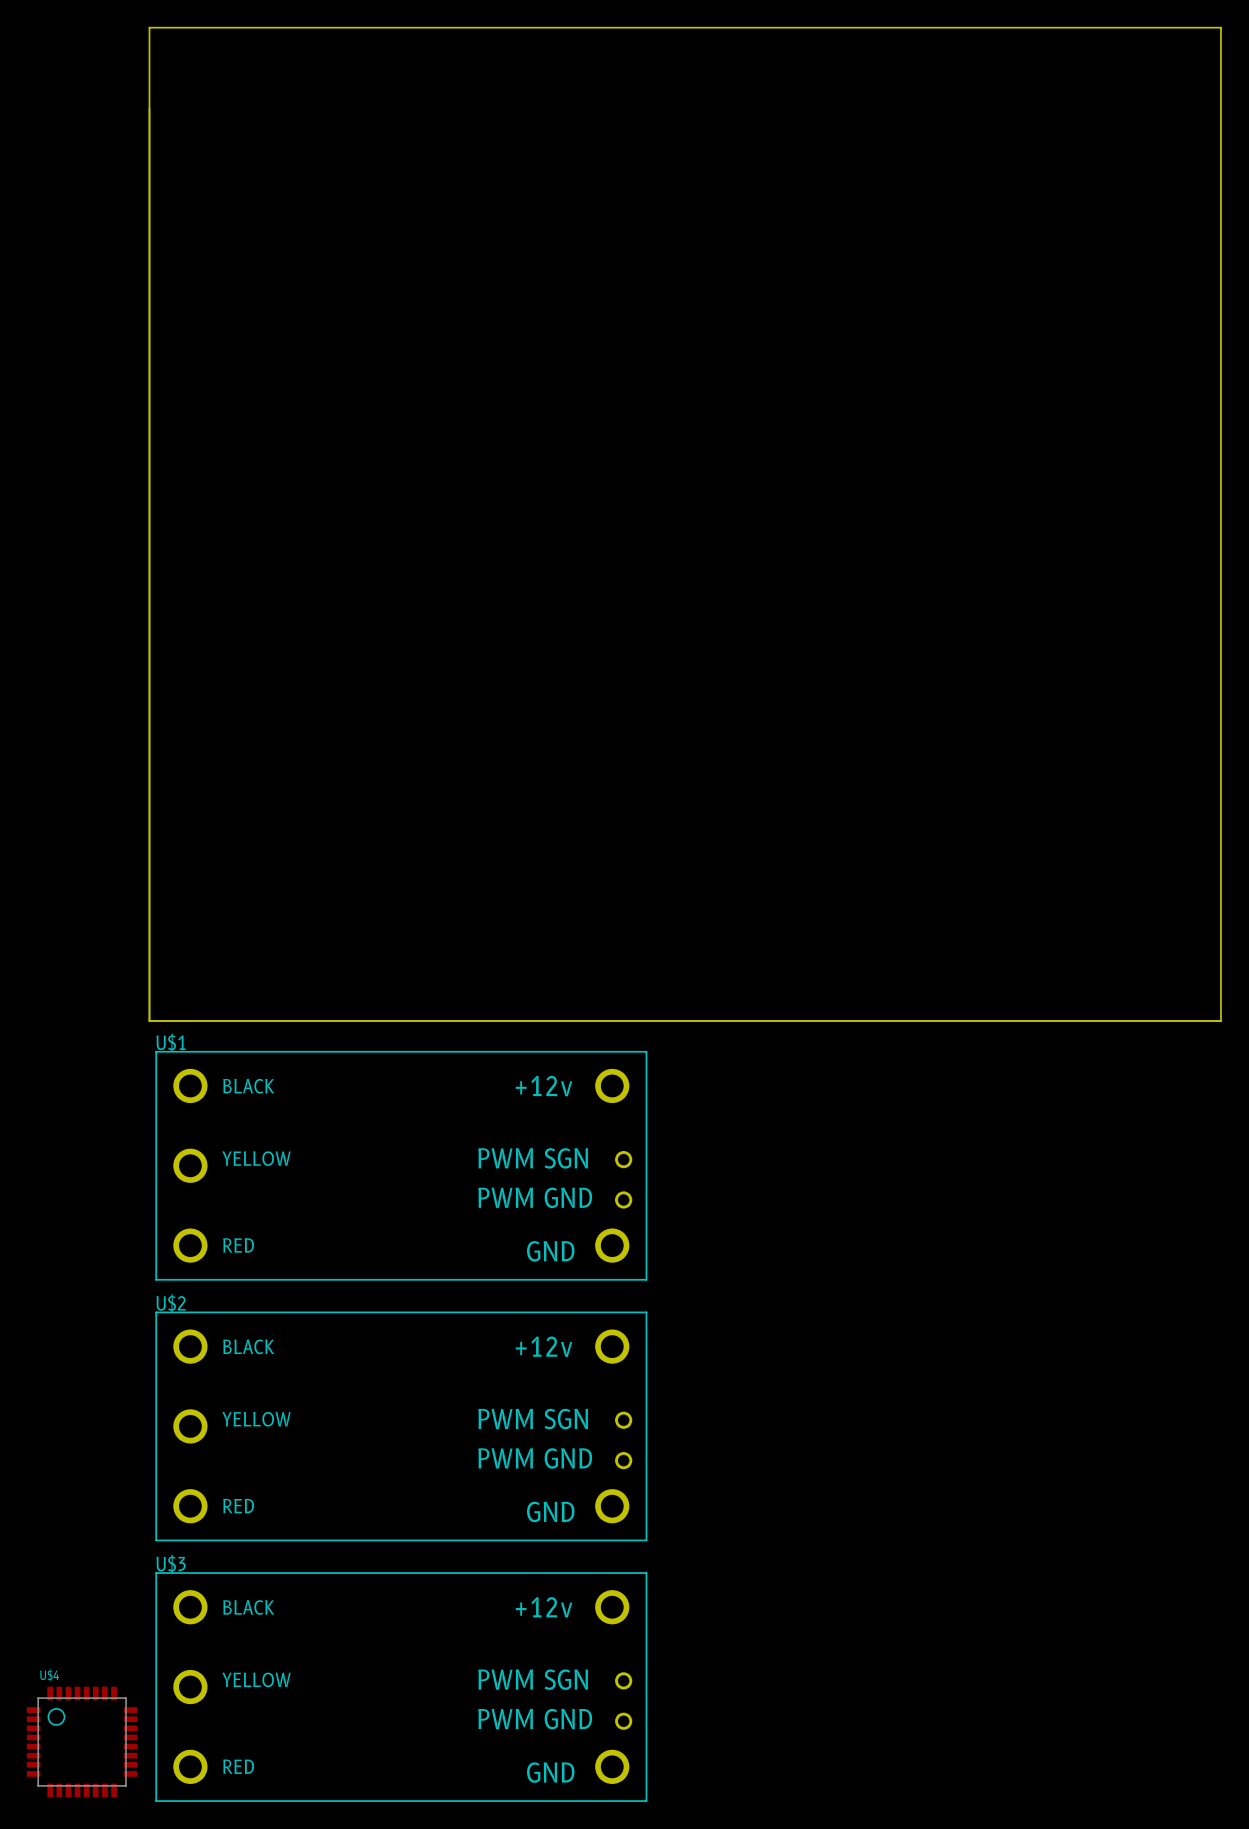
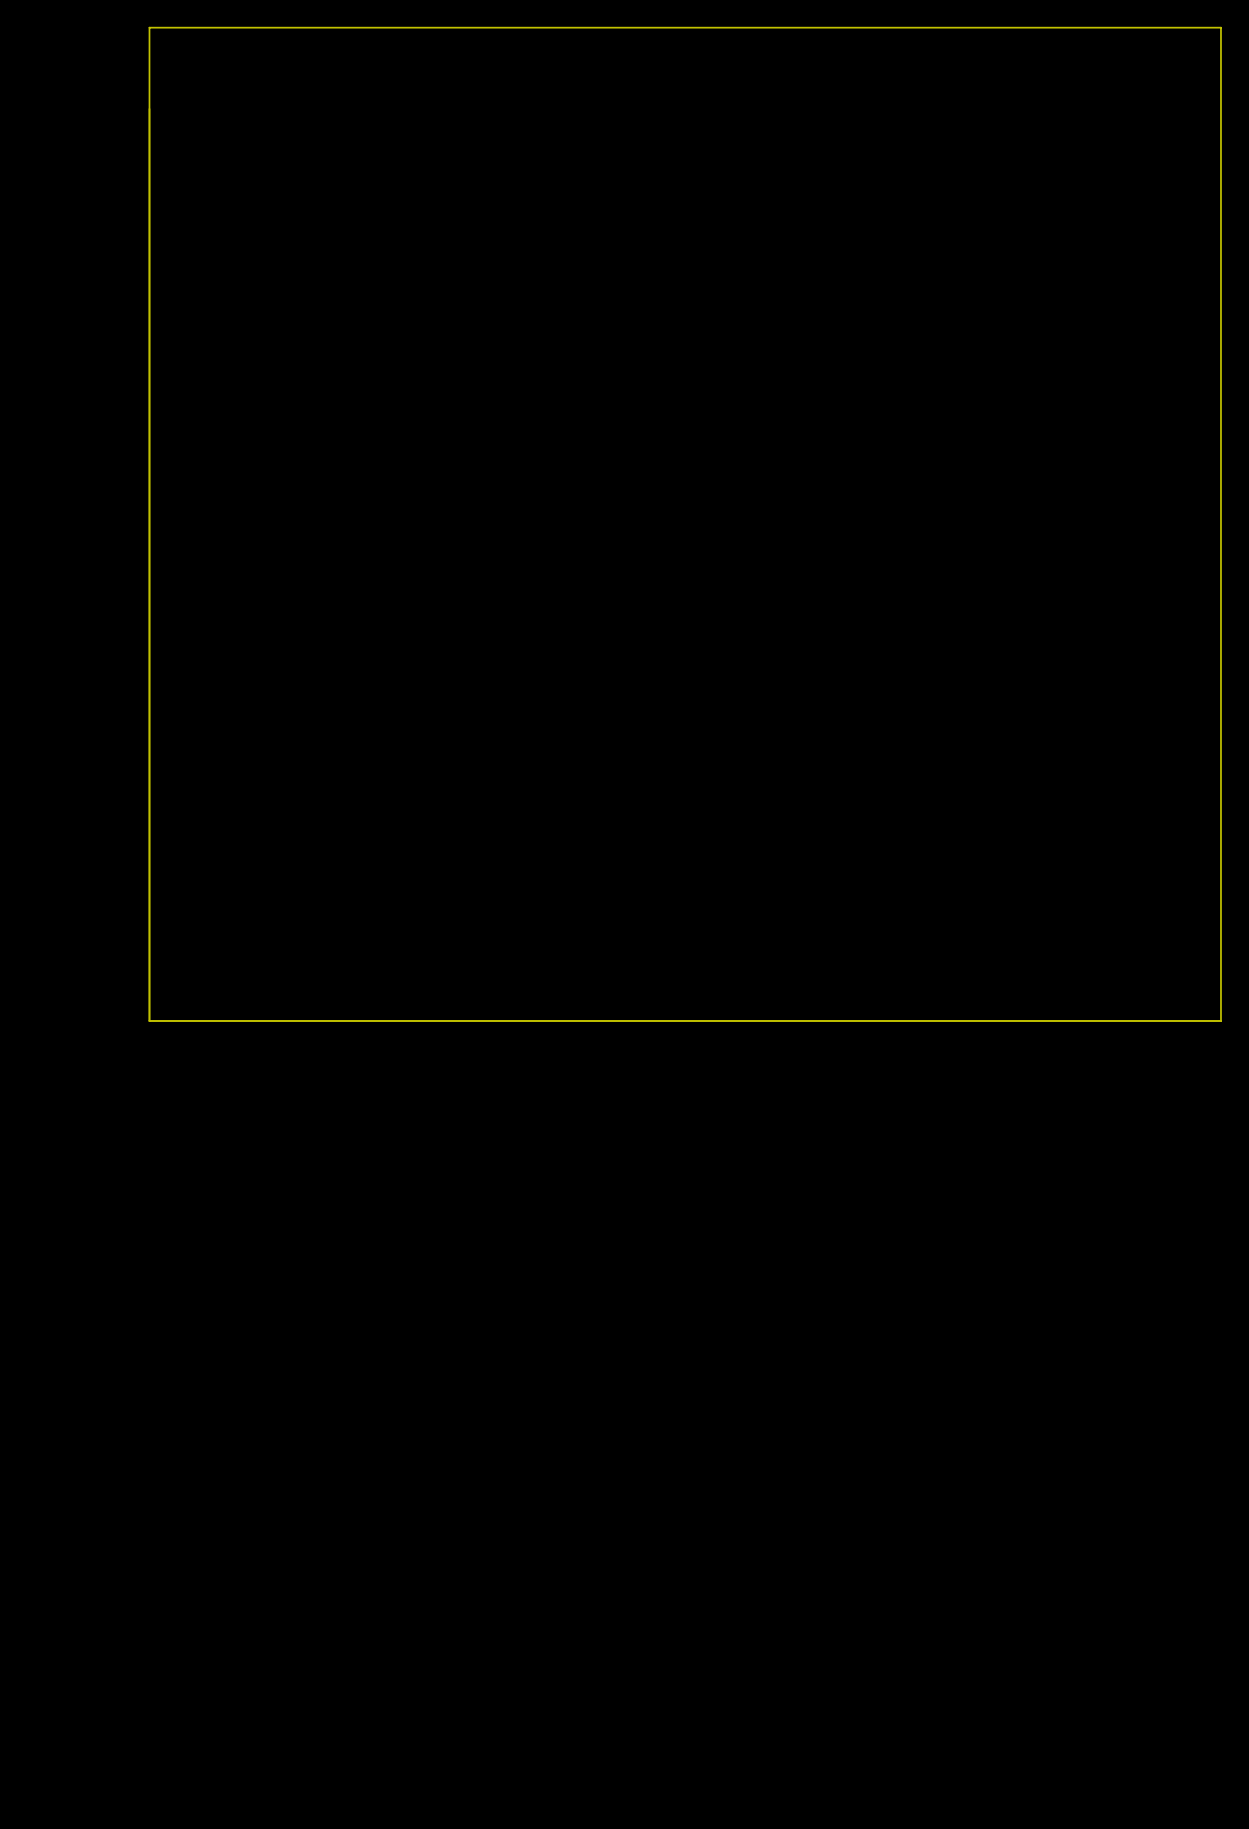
U$1: (401, 1165) -> none
U$2: (401, 1426) -> none
U$3: (401, 1687) -> none
U$4: (82, 1742) -> none

